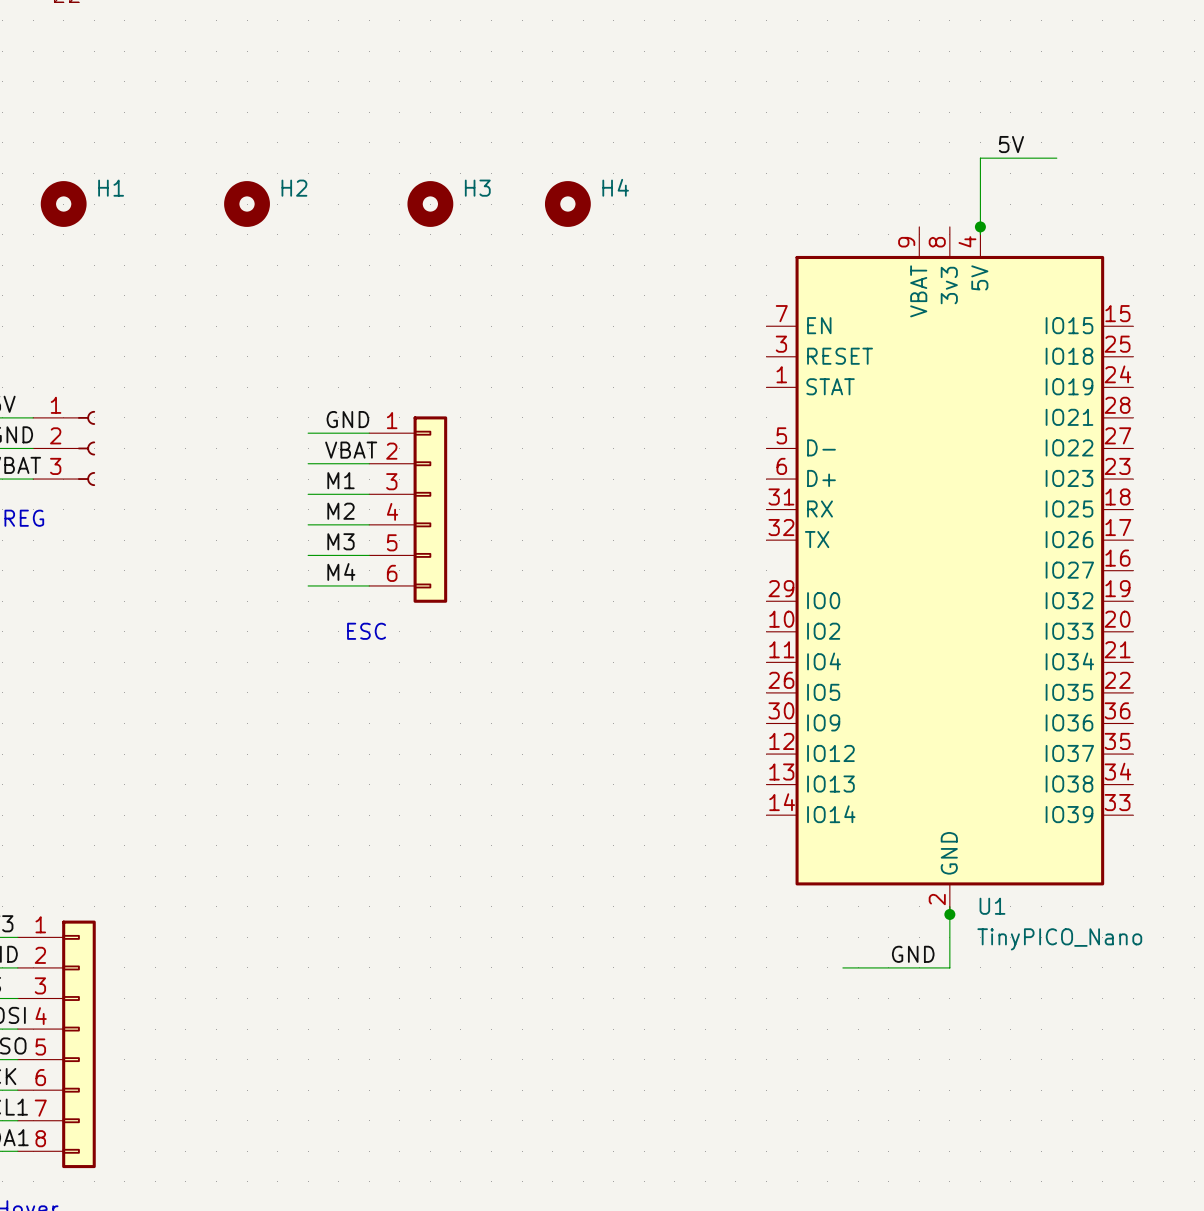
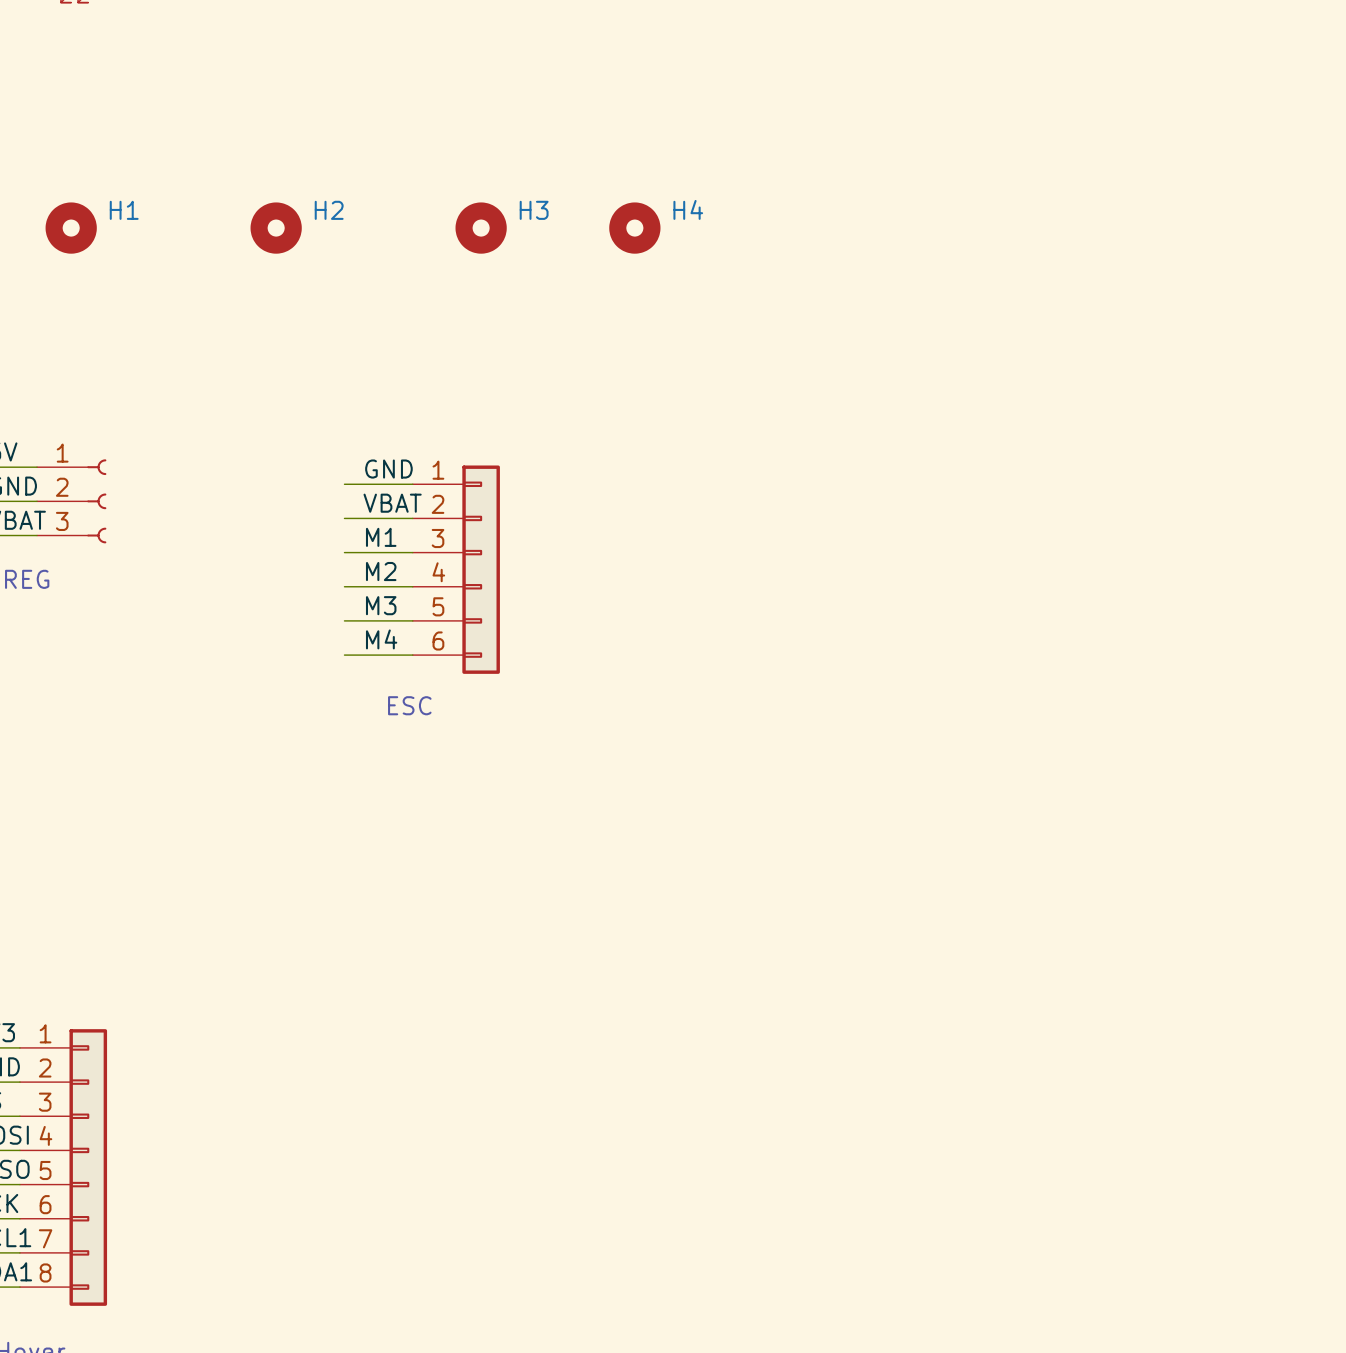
label: 5V (1011, 144) -> none
wire: (1056, 158) (980, 158) (980, 234) -> none
junction: (980, 226) -> none
U1: TinyPICO_Nano (949, 570) -> none
wire: (949, 906) (949, 967) (842, 967) -> none
junction: (949, 914) -> none
label: GND (913, 954) -> none

